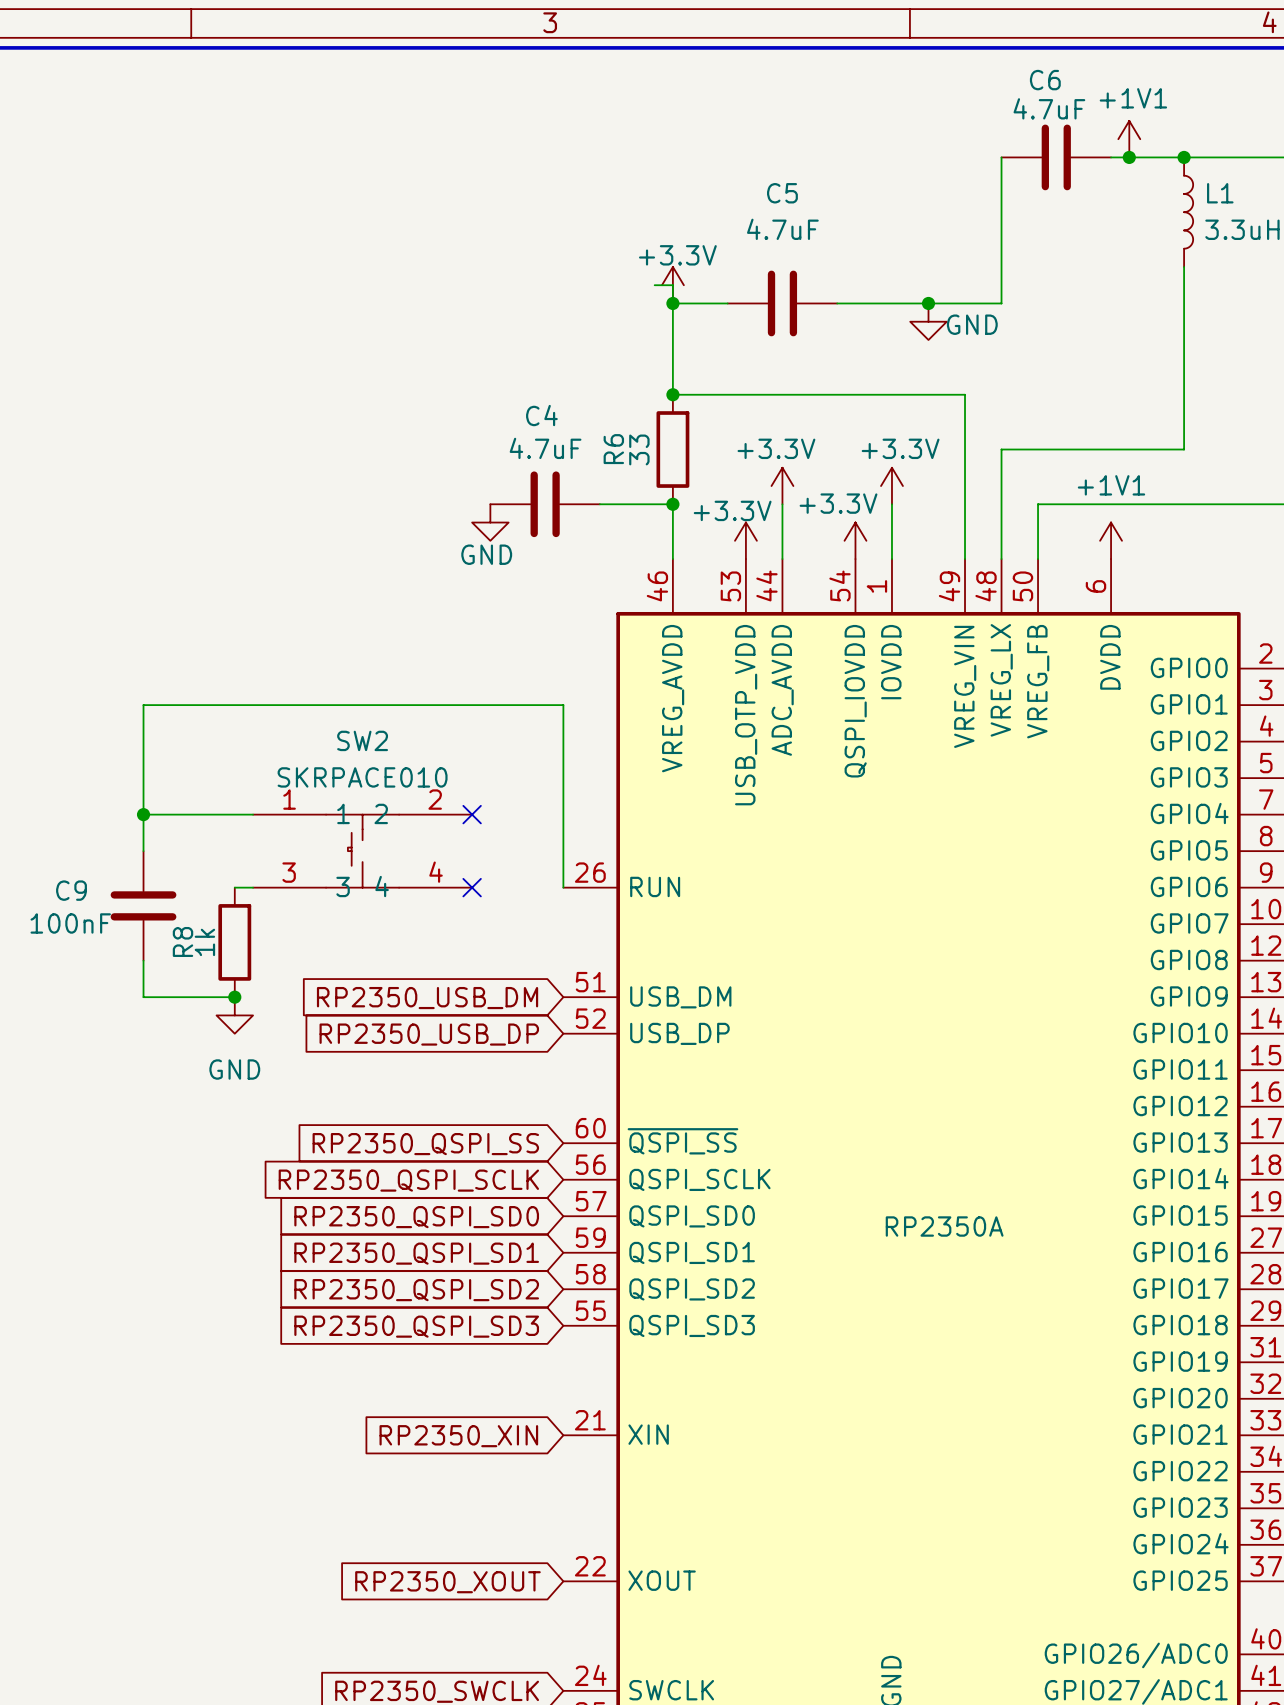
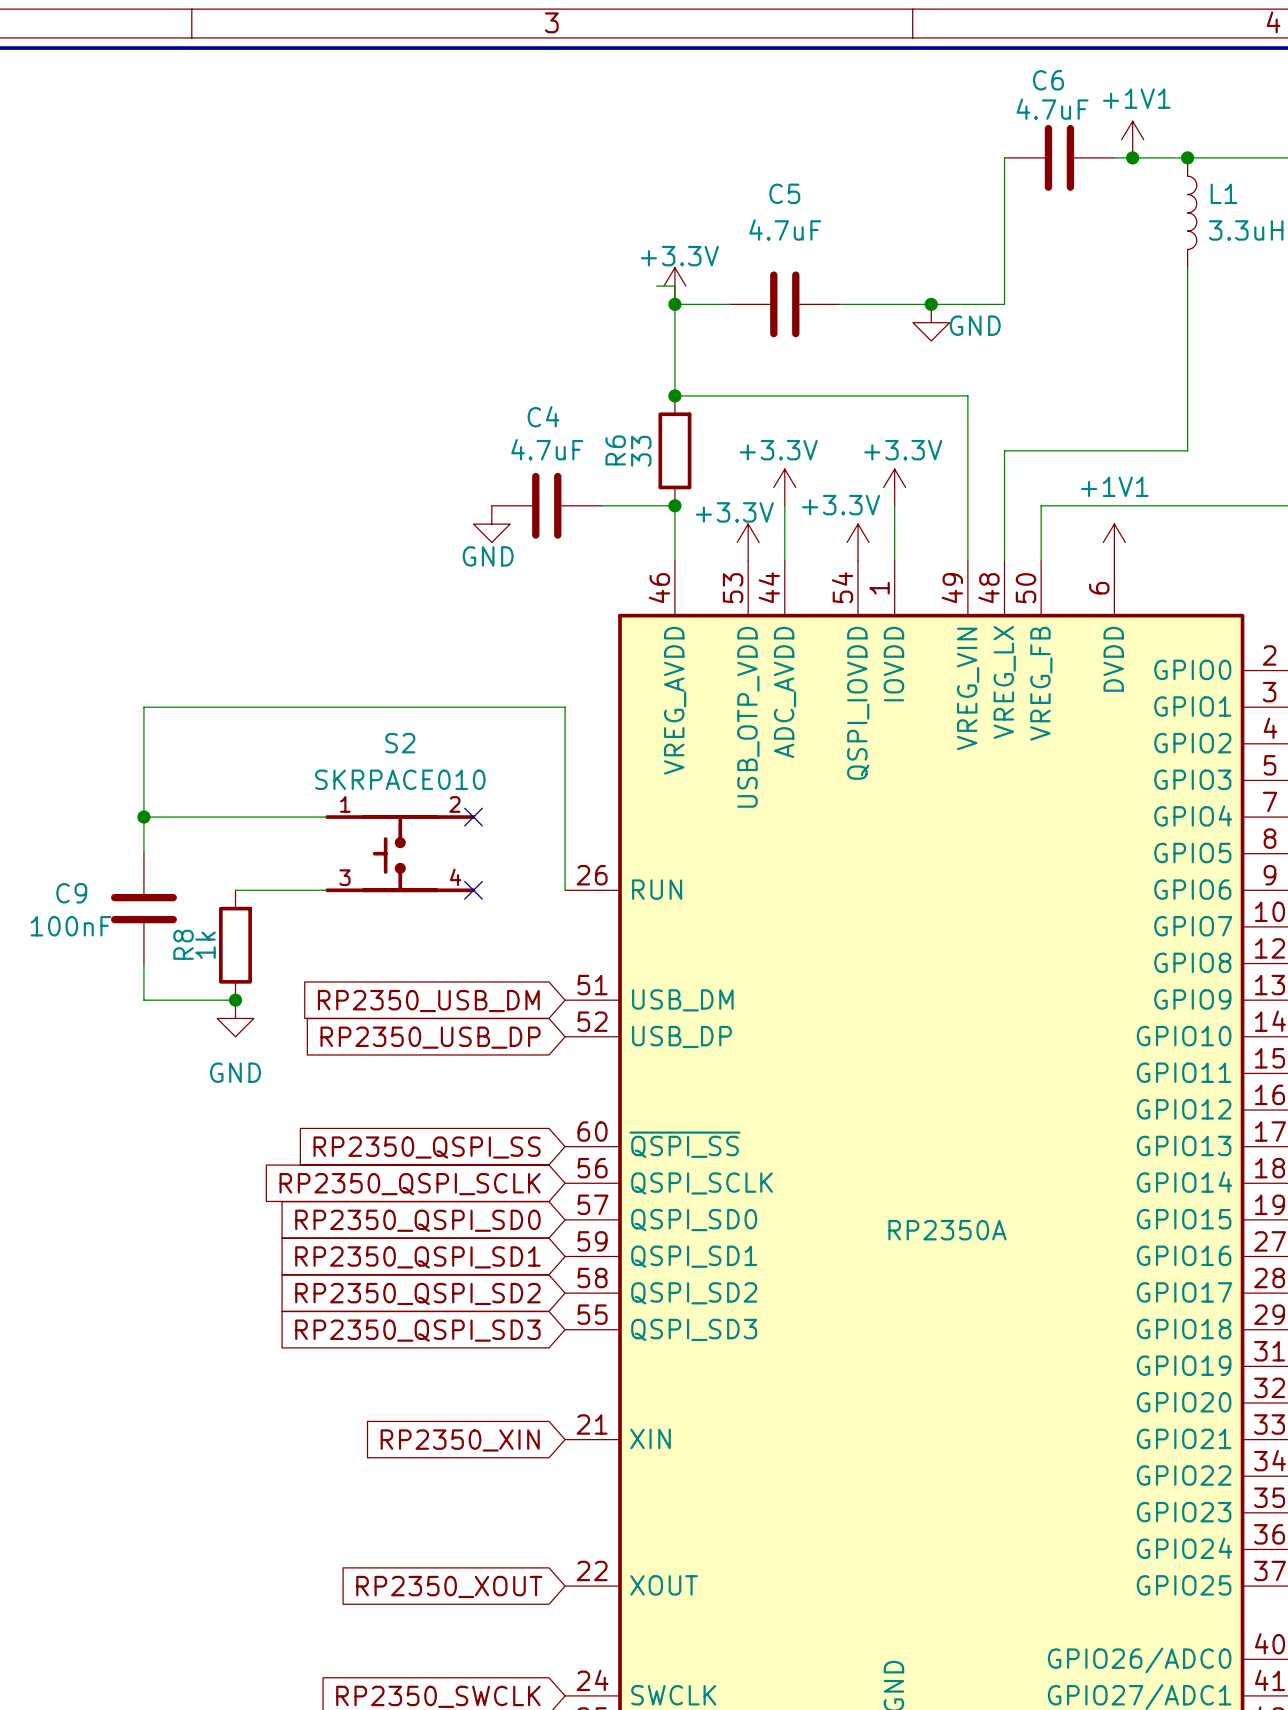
SW2: SKRPACE010 (362, 851) -> none
S2: none -> SKRPACE010 (400, 853)

